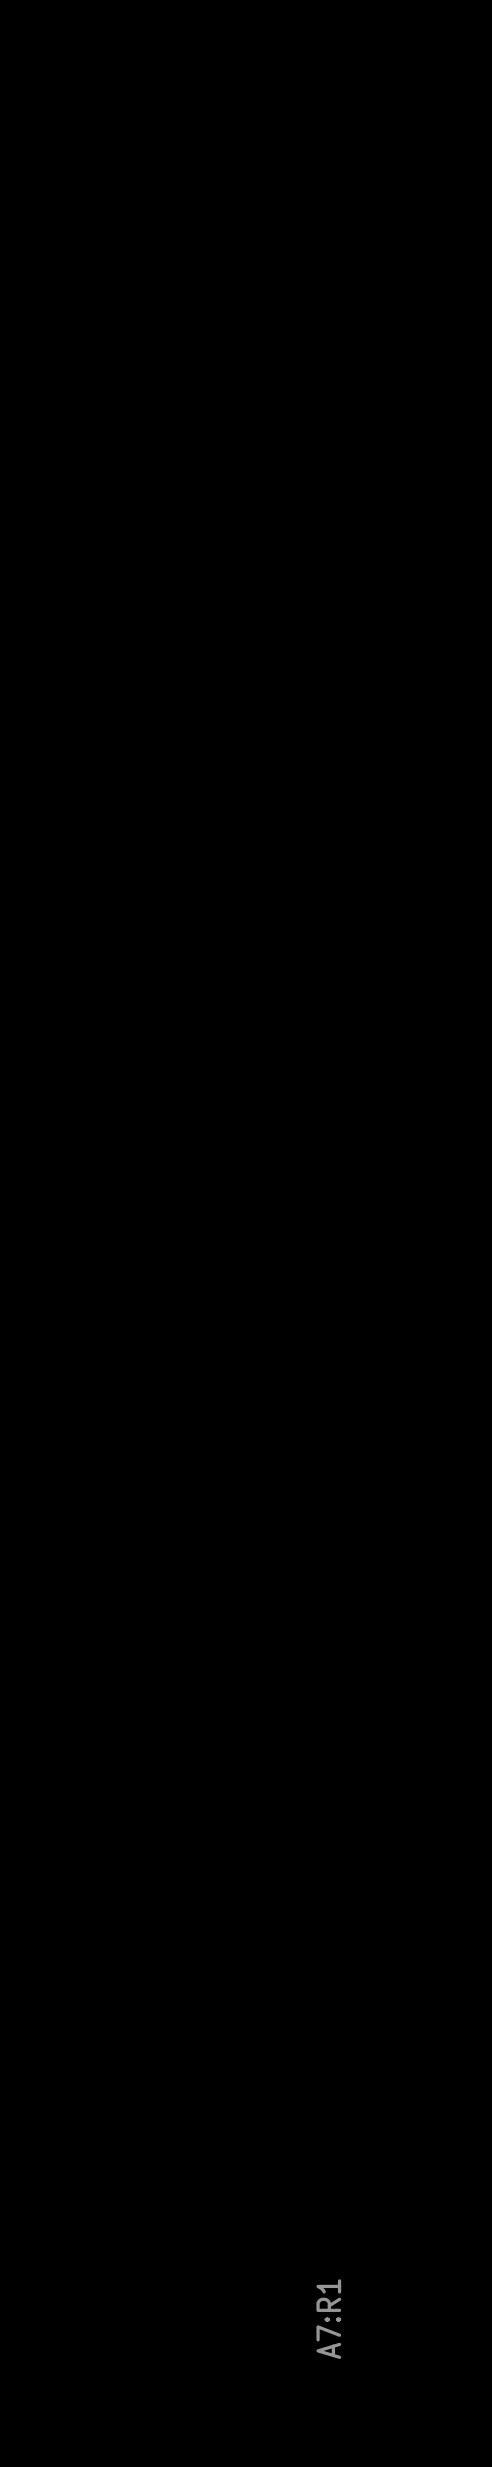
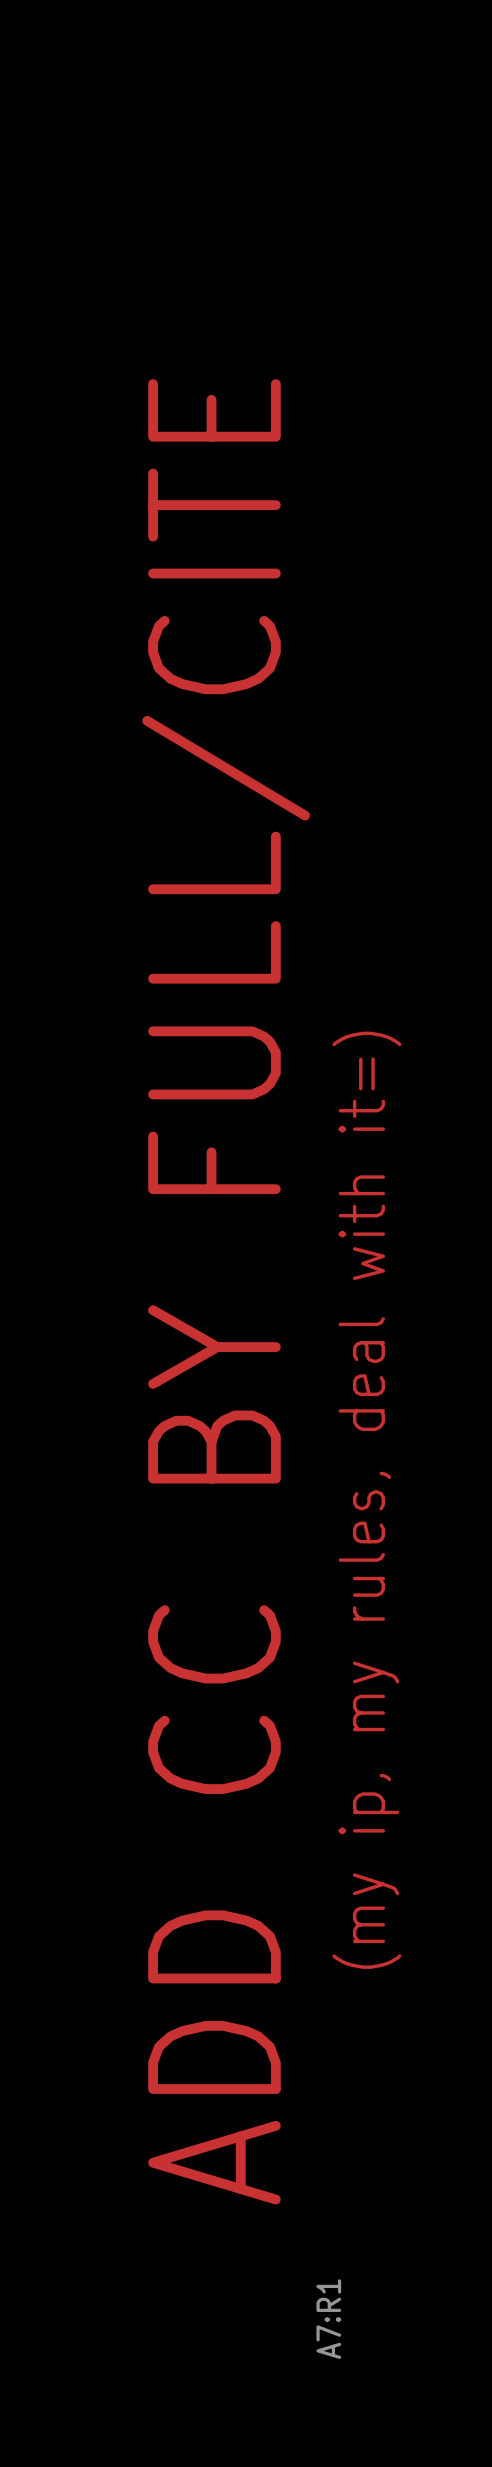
text: none -> ADD CC BY FULL/CITE (226, 1291)
text: none -> (my ip, my rules, deal with it=) (366, 1500)

